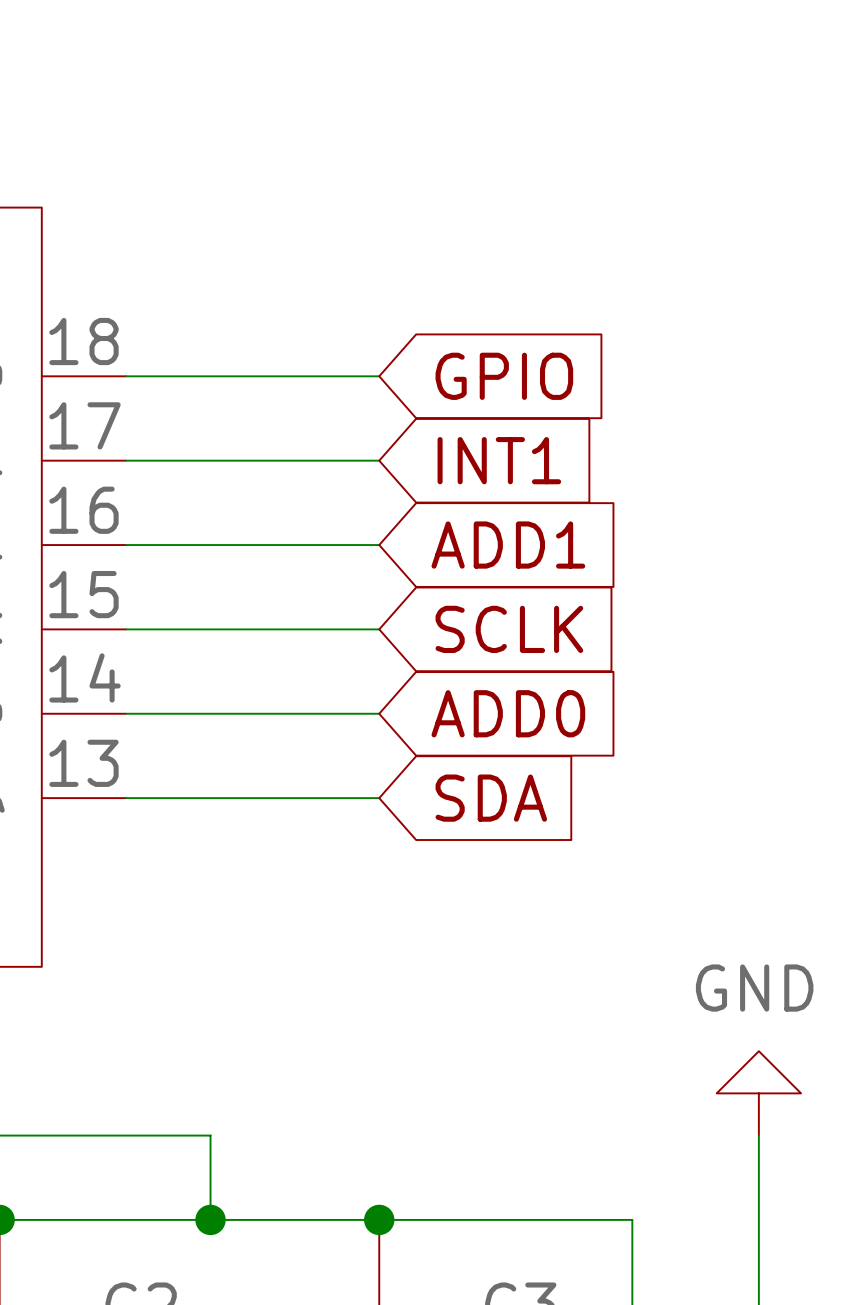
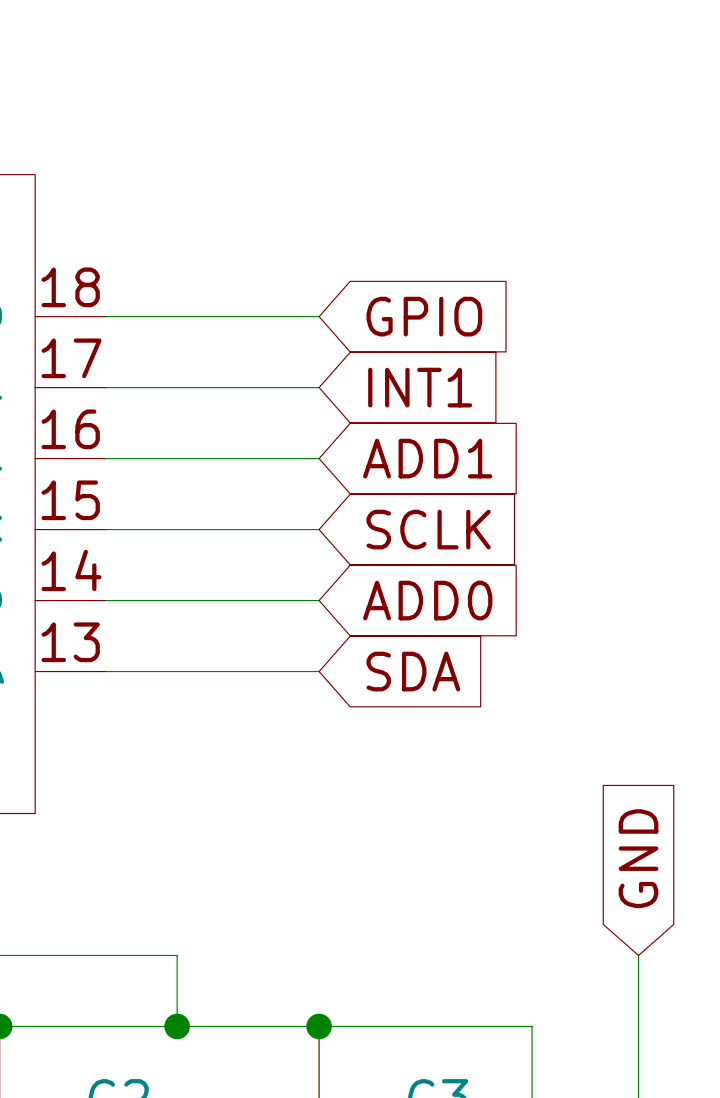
global label: none -> GND (638, 858)
power symbol: GND (758, 1093) -> none

